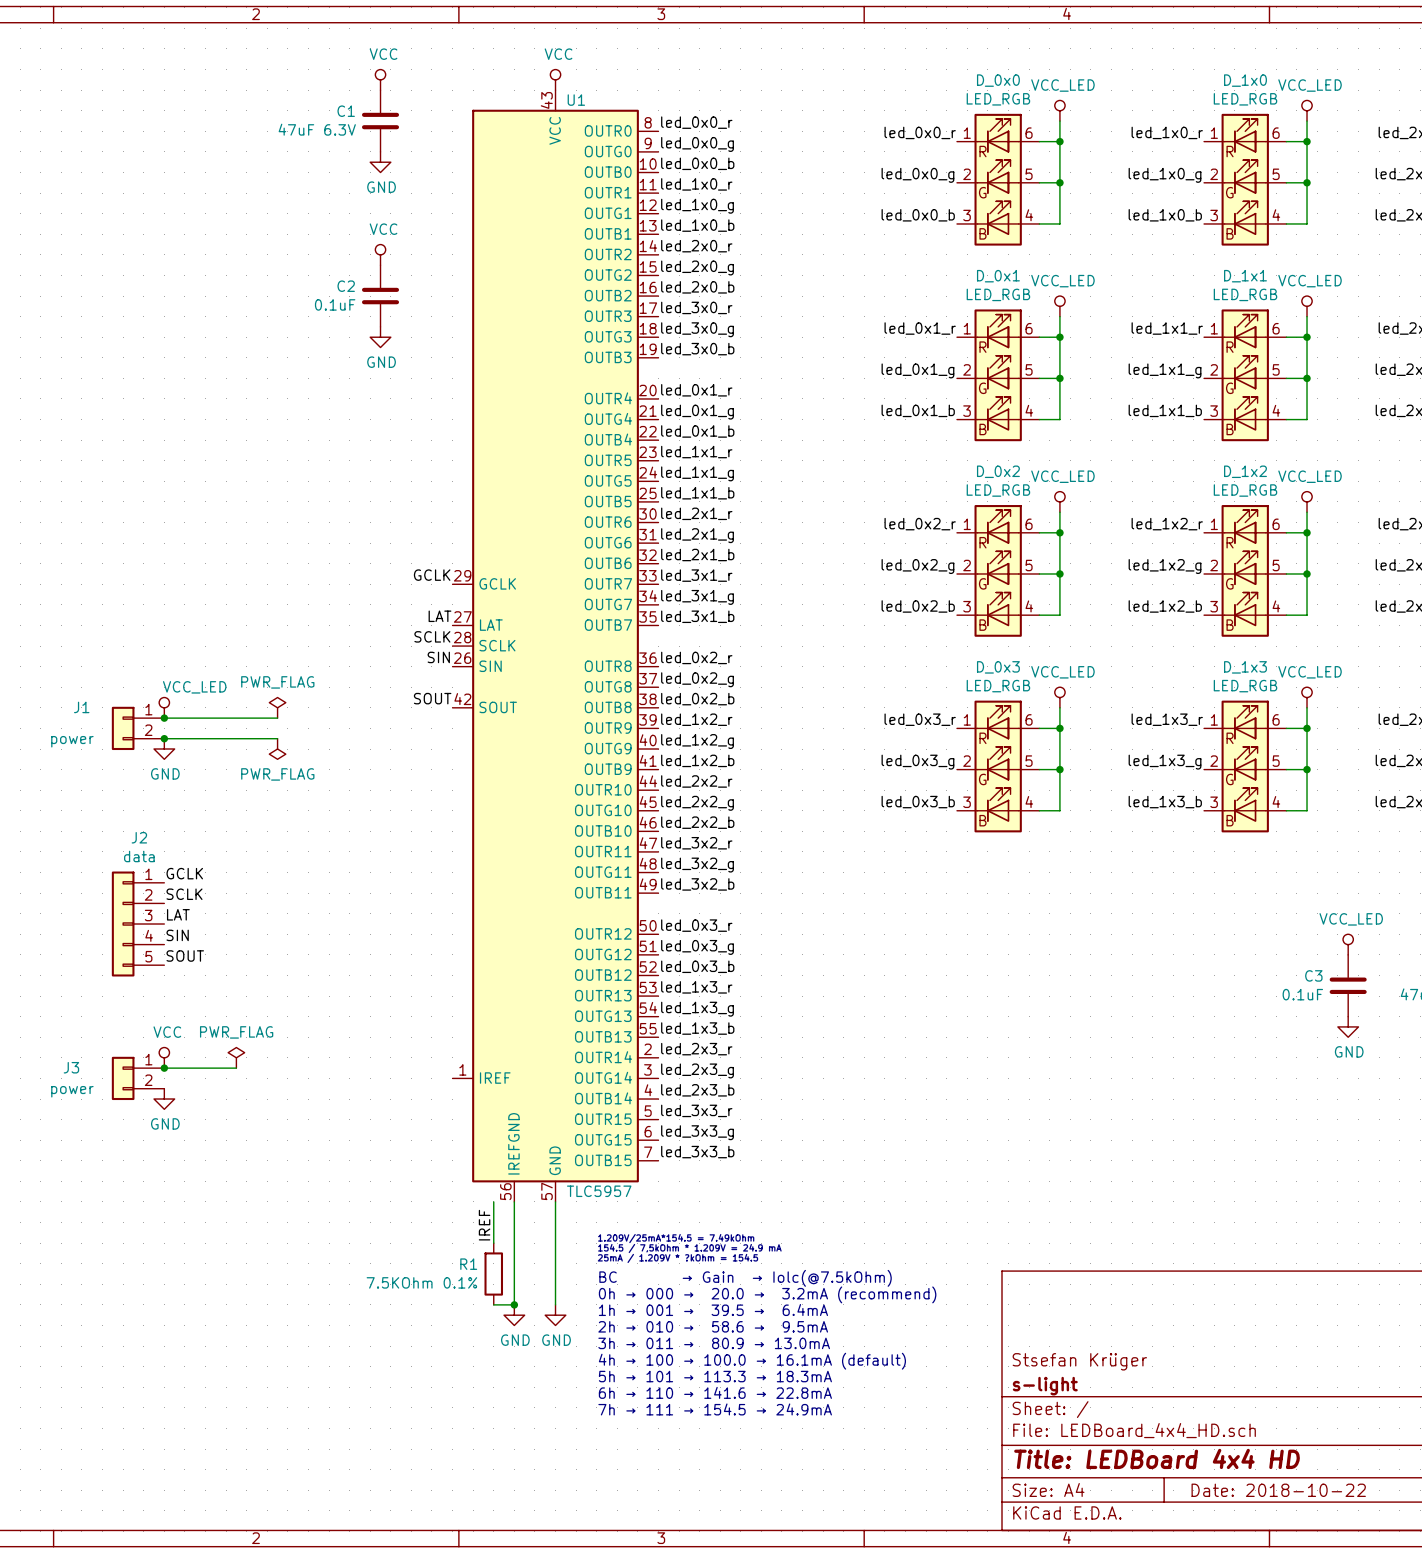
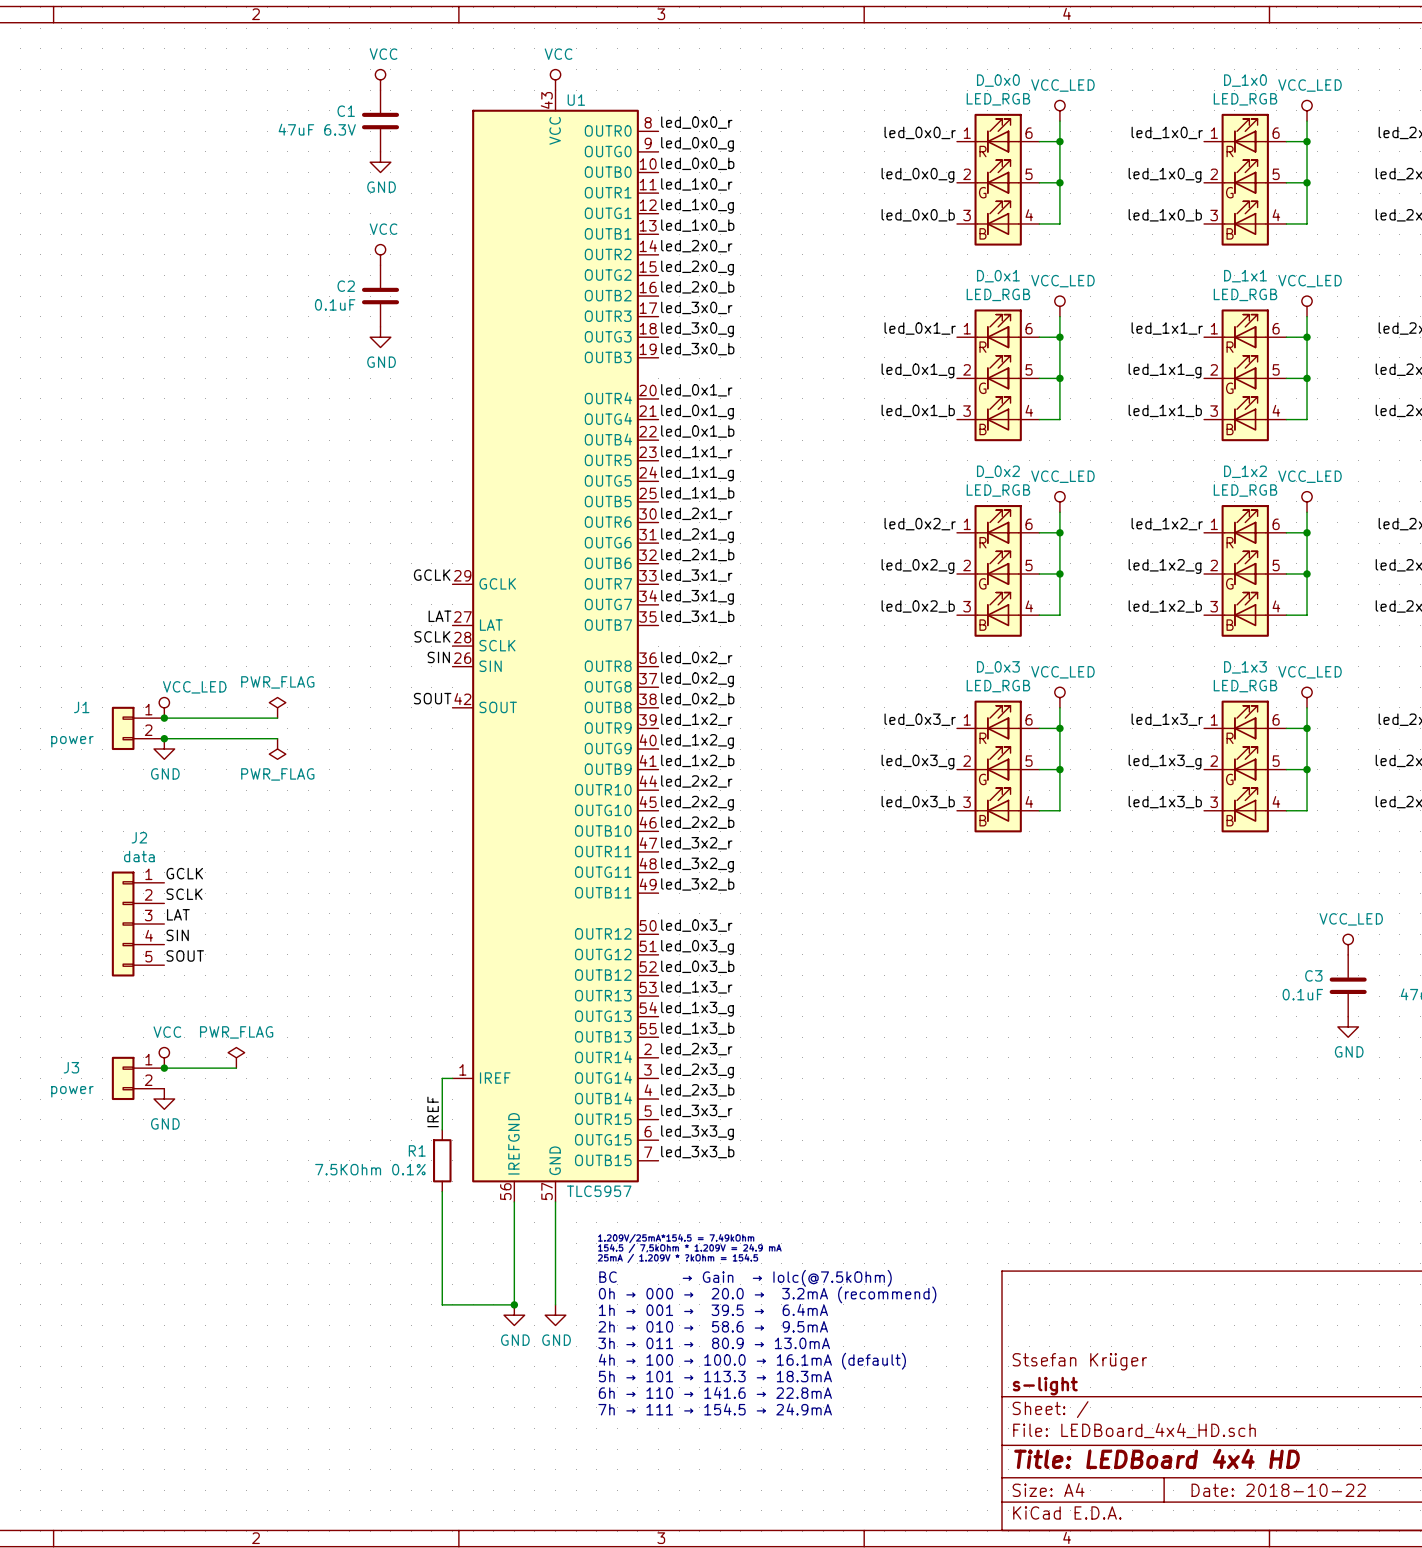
wire: none -> (452, 1078) (442, 1078) (442, 1129)
wire: none -> (442, 1191) (442, 1304) (493, 1304)
wire: (493, 1201) (493, 1243) -> none
label position: IREF (484, 1225) -> IREF (433, 1111)
R1 position: (493, 1274) -> (442, 1160)

